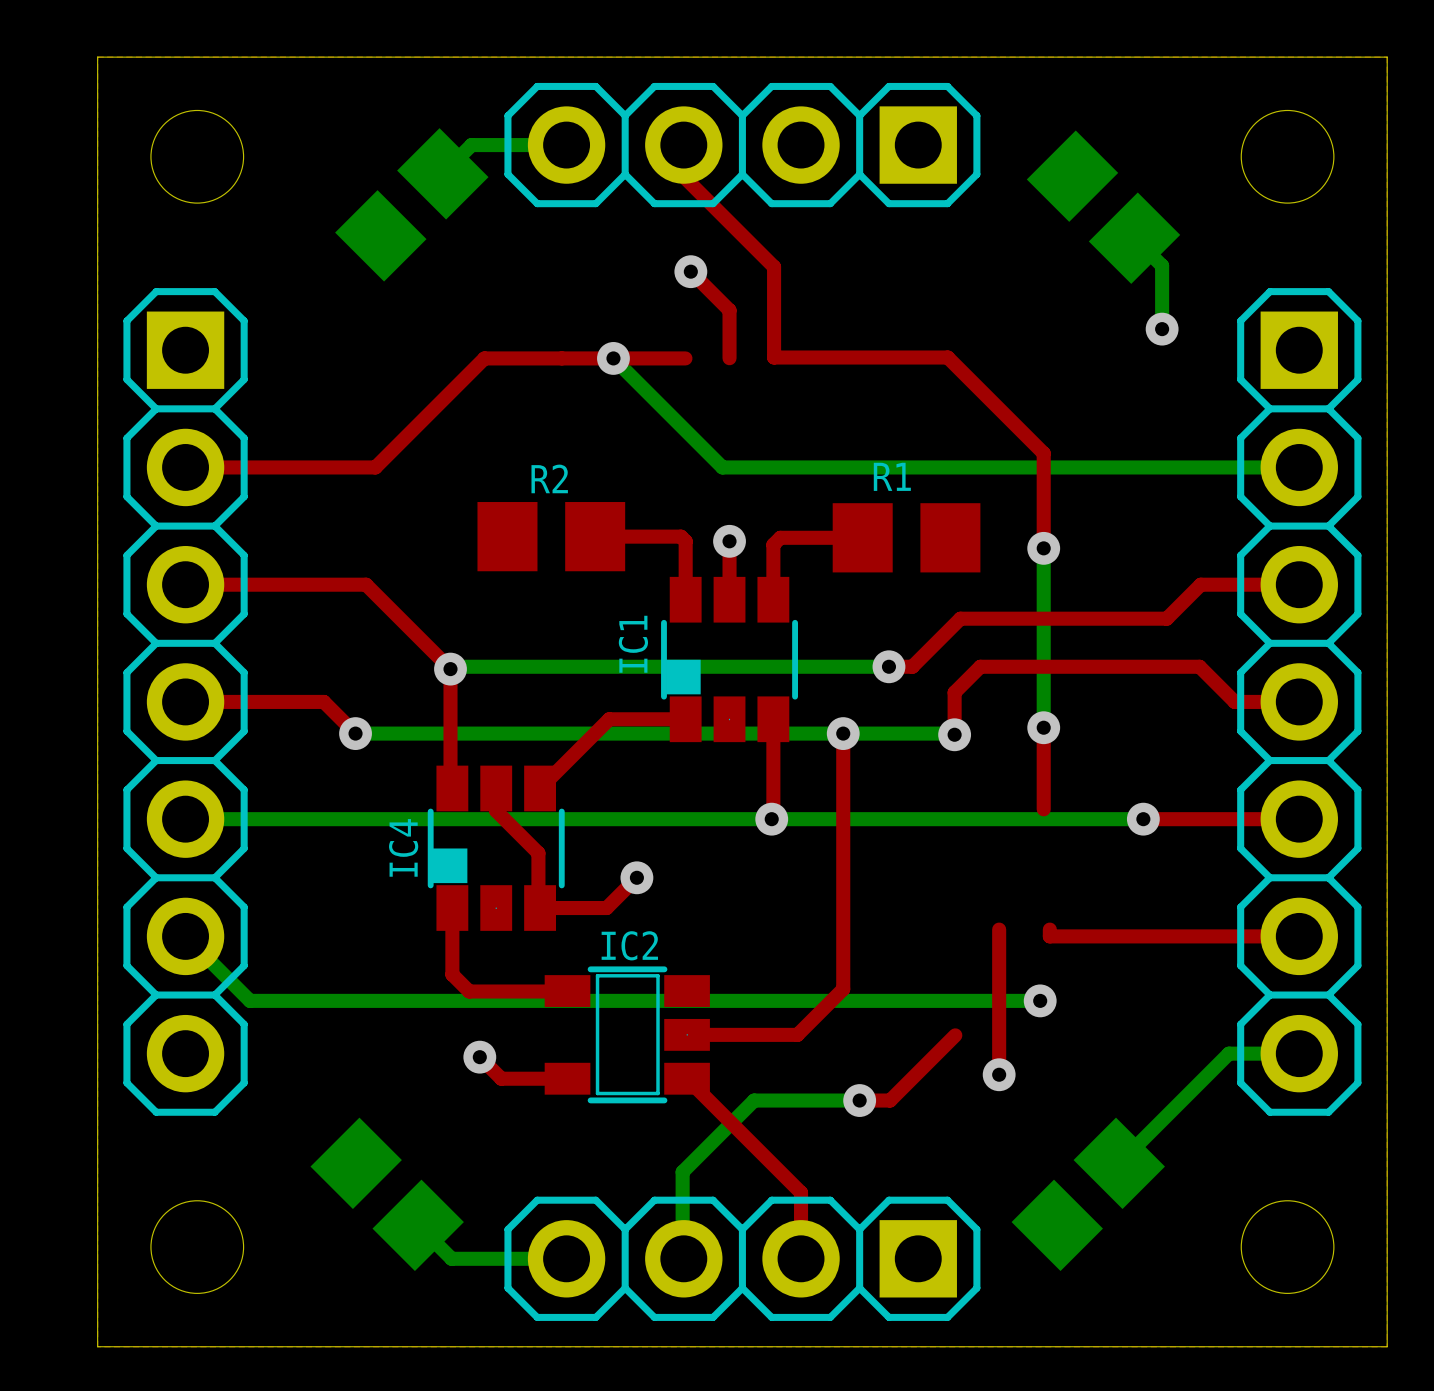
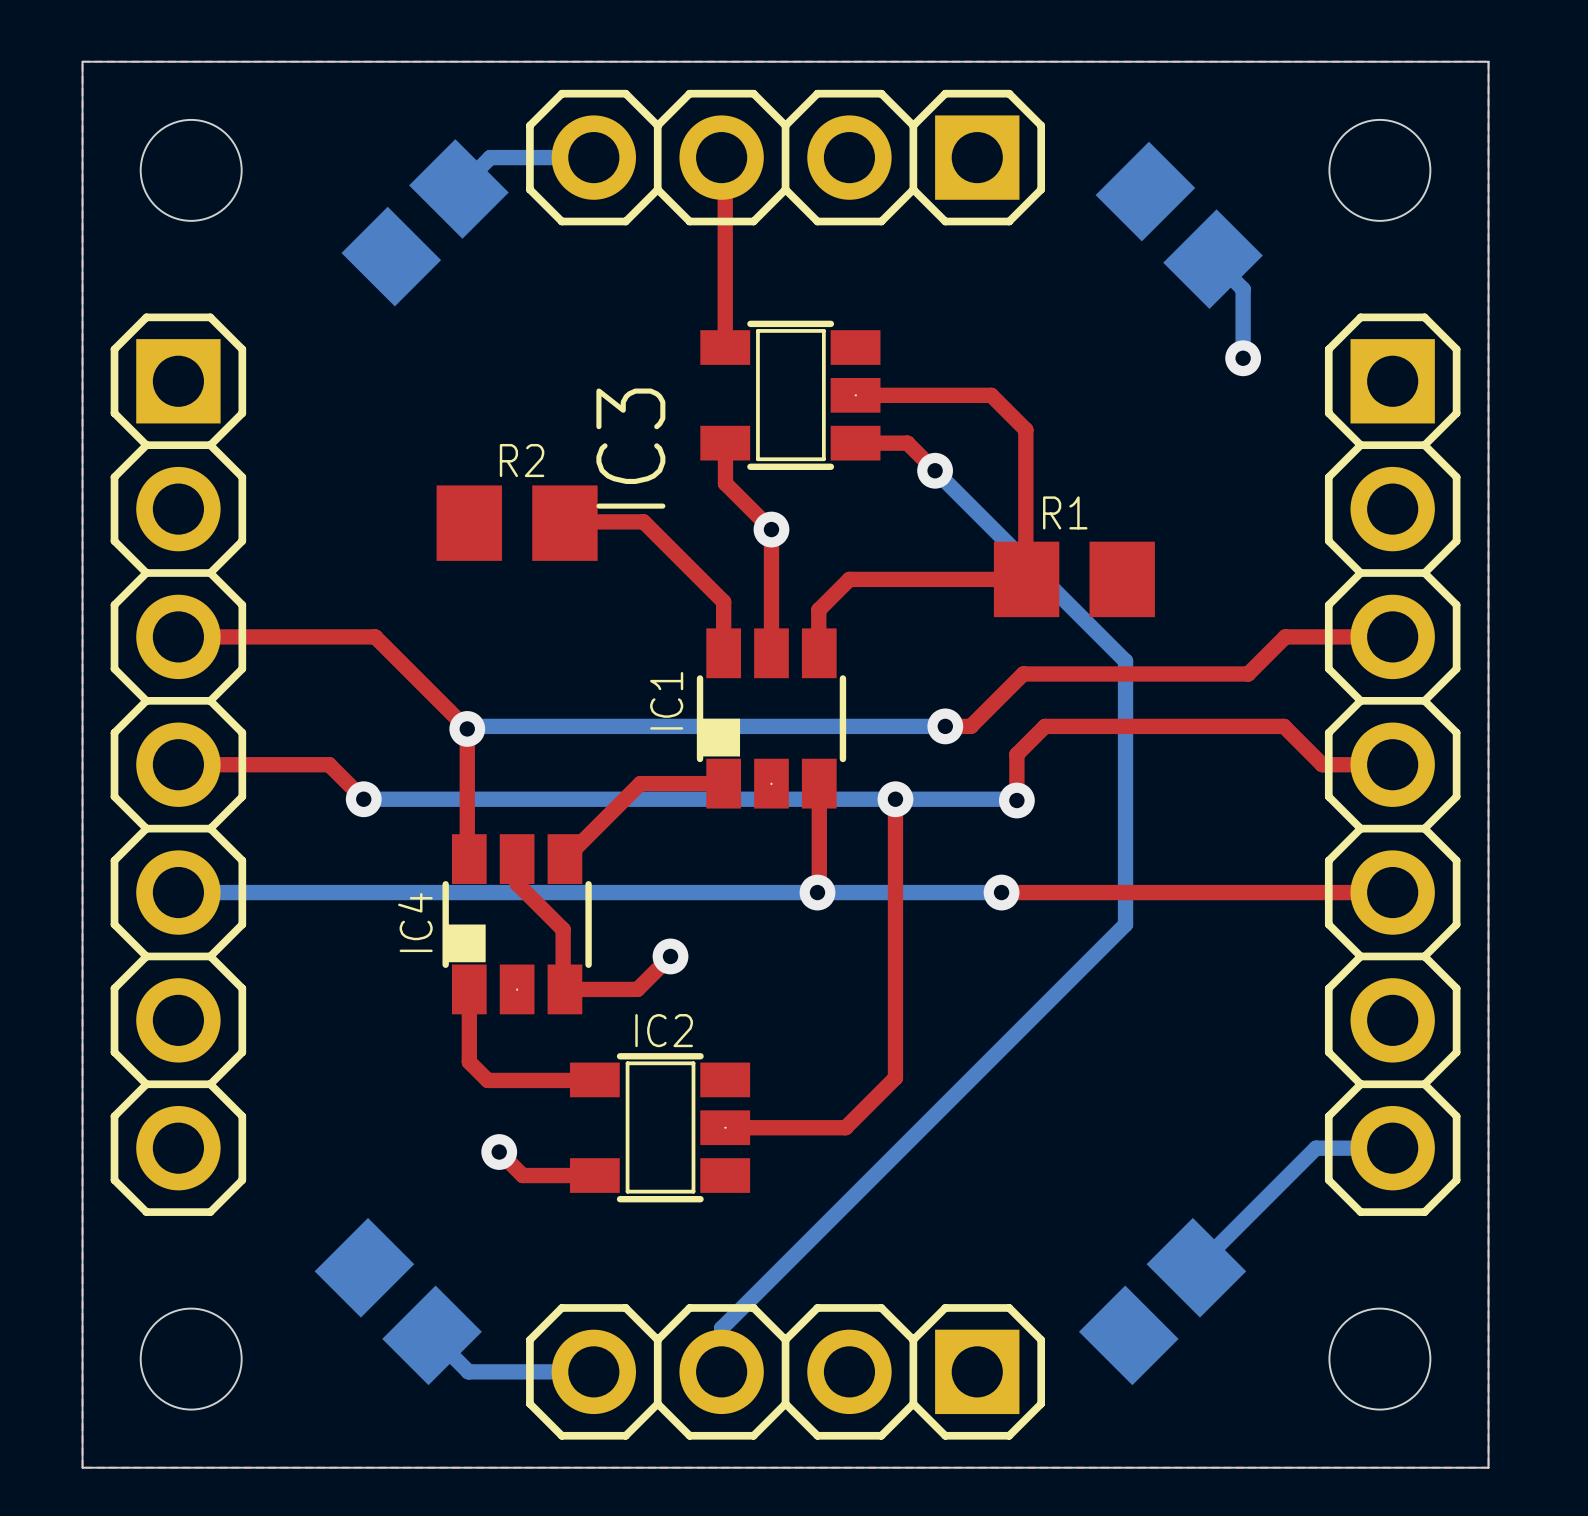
top track: (683, 145) (683, 176) (774, 266) (774, 357) (947, 357) (1043, 453) (1043, 548) -> (721, 157) (725, 161) (725, 347)
top track: (690, 271) (729, 310) (729, 358) -> none
via: (690, 271) -> none
bottom track: (613, 358) (722, 467) (1299, 467) -> none
via: (613, 358) -> none
top track: (685, 358) (484, 358) (375, 467) (185, 467) -> none
IC3: none -> (790, 395)
top track: none -> (855, 443) (907, 443) (935, 470)
top track: none -> (725, 443) (725, 483) (771, 529) (771, 589)
via: none -> (935, 470)
R2 position: (551, 536) -> (517, 523)
top track: (595, 536) (680, 536) (685, 541) (685, 552) -> (564, 523) (643, 521) (723, 601)
top track: (862, 537) (780, 537) (773, 544) (773, 599) -> (855, 395) (991, 395) (1025, 429) (1026, 579) (849, 579) (818, 610) (818, 652)
R1 position: (906, 537) -> (1074, 579)
via position: (729, 541) -> (771, 529)
bottom track: (1043, 548) (1043, 727) -> none
via: (1043, 548) -> none
top track: (1043, 727) (1043, 809) -> none
via: (1043, 727) -> none
bottom track: (940, 819) (1143, 819) -> none
top track: none -> (1001, 892) (1222, 892)
via: none -> (1001, 892)
via: (1143, 819) -> none
top track: (999, 929) (999, 1074) -> none
top track: (1049, 929) (1049, 936) (1299, 936) -> none
bottom track: (185, 936) (250, 1000) (1040, 1000) -> none
via: (1040, 1000) -> none
top track: (955, 1035) (890, 1100) (859, 1100) -> none
via: (999, 1074) -> none
top track: (687, 1078) (801, 1192) (801, 1258) -> none
bottom track: (859, 1100) (754, 1100) (682, 1172) (683, 1258) -> (935, 470) (1125, 661) (1125, 924) (721, 1328) (721, 1371)
via: (859, 1100) -> none

